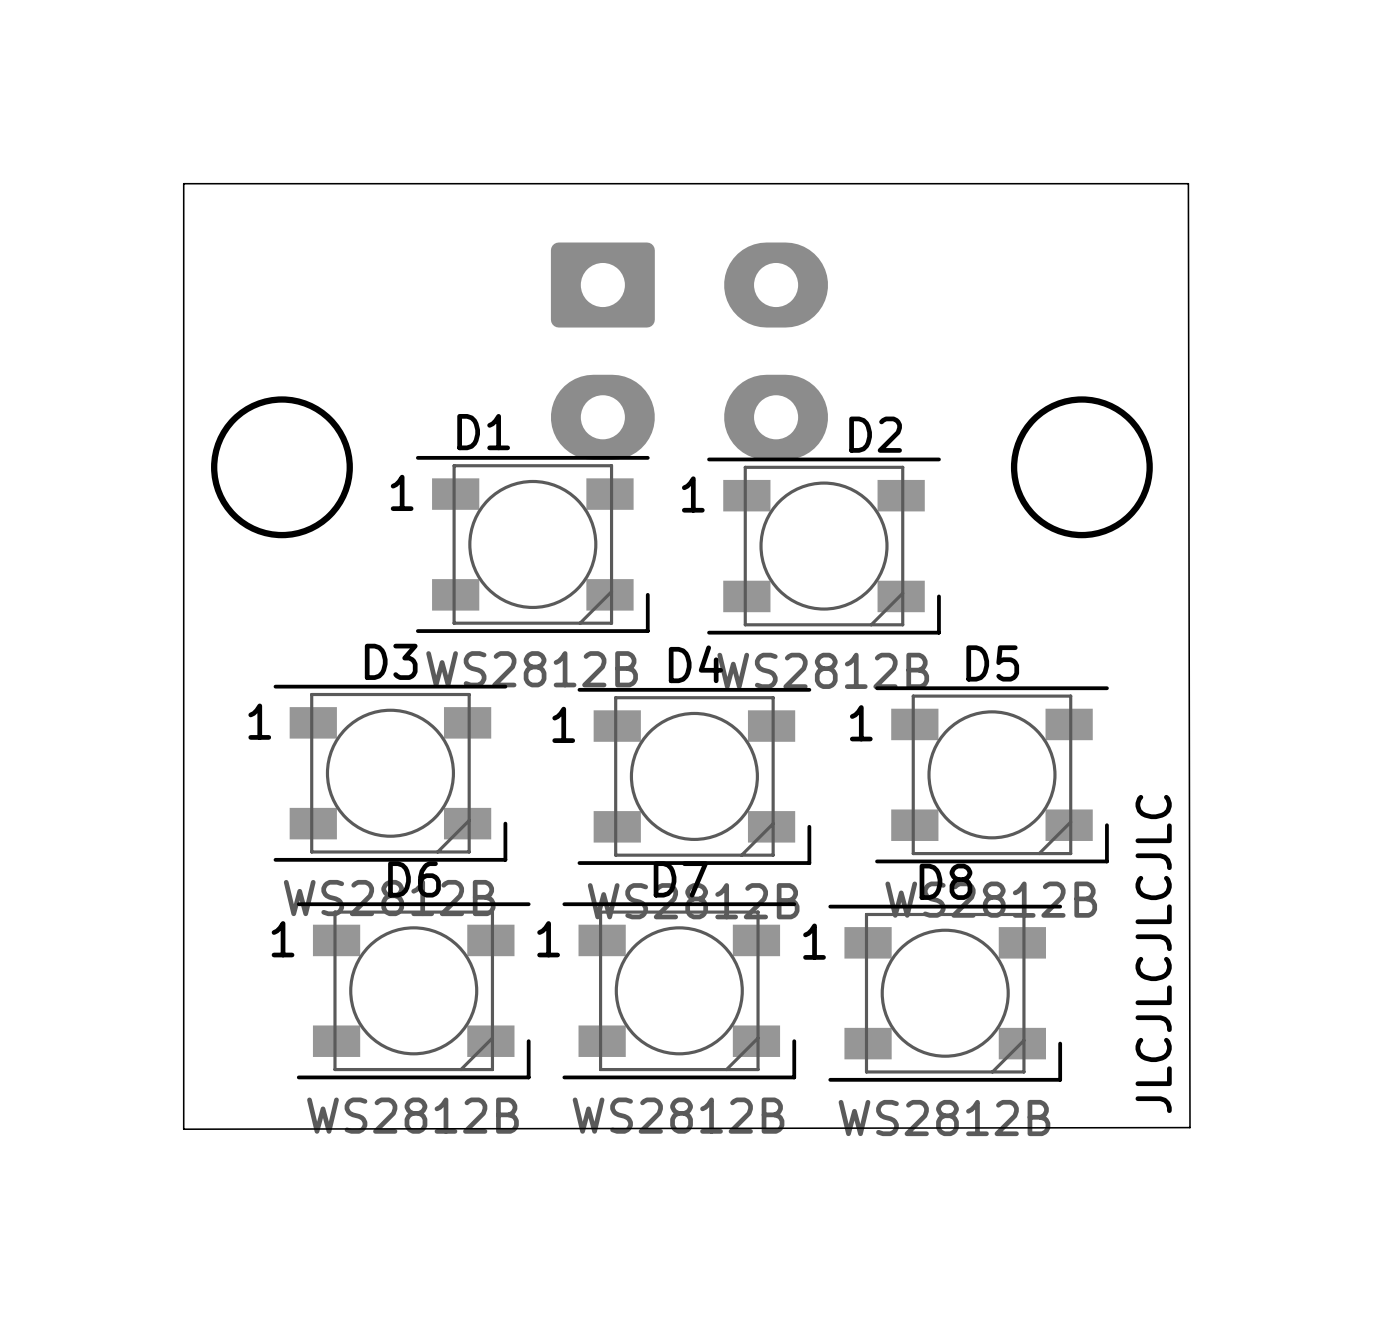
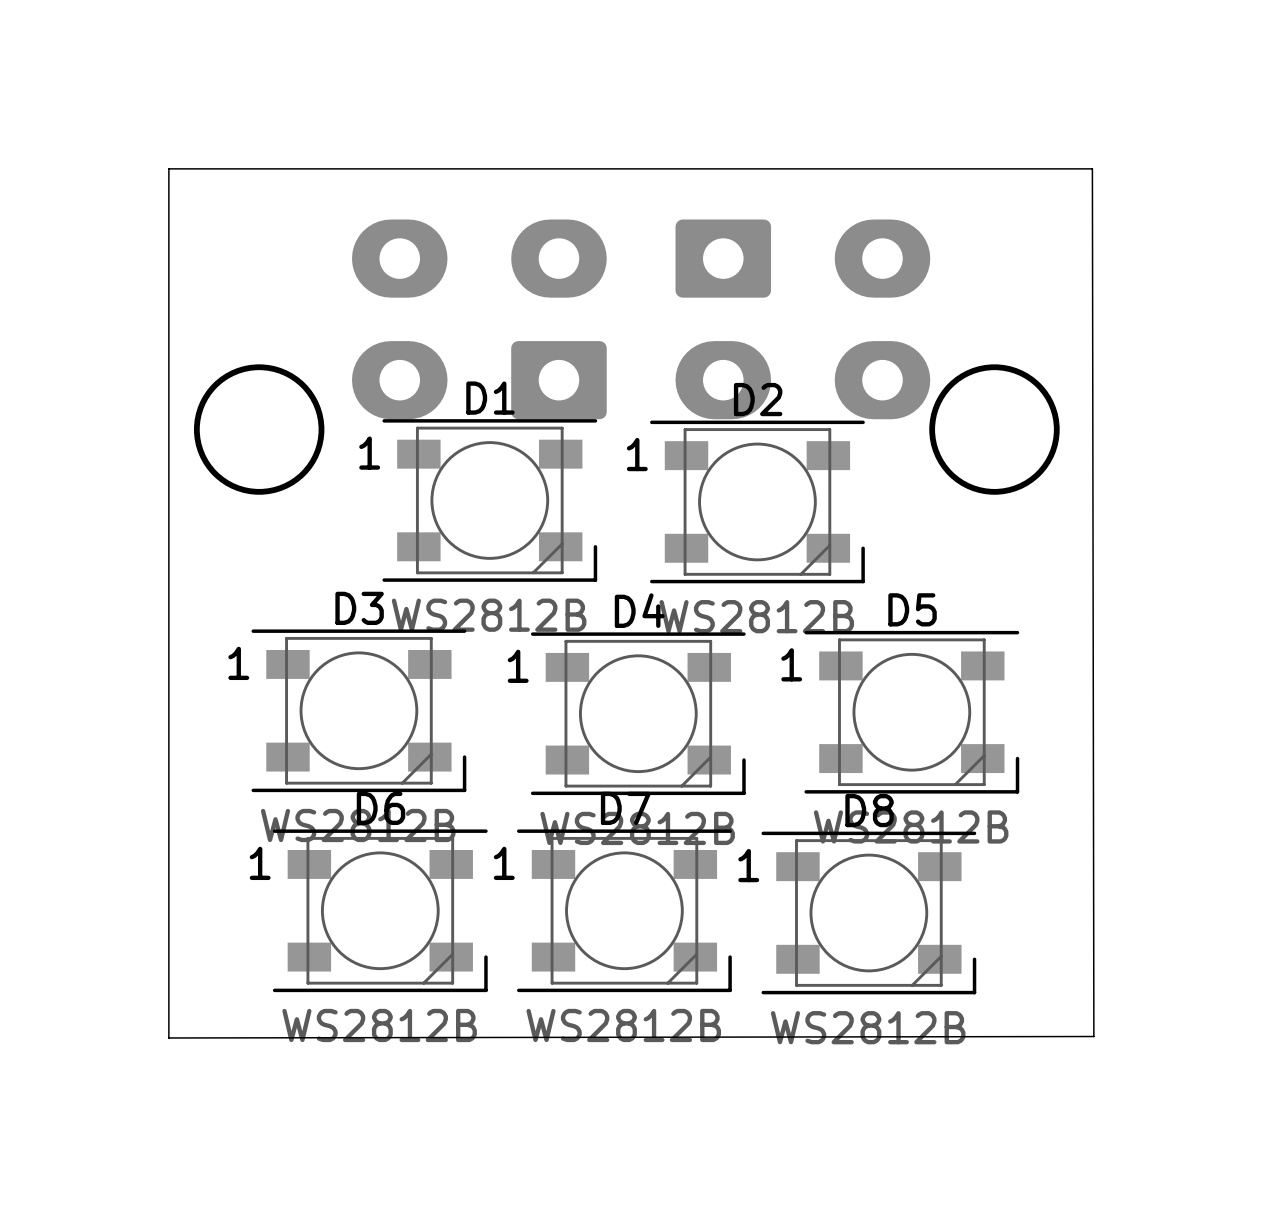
part: none -> (479, 319)
part: none -> (802, 319)
part: (689, 351) -> none
D1 name position: D1 (483, 432) -> D1 (490, 398)
D2 name position: D2 (875, 434) -> D2 (758, 399)
text: JLCJLCJLCJLC (1153, 953) -> none

